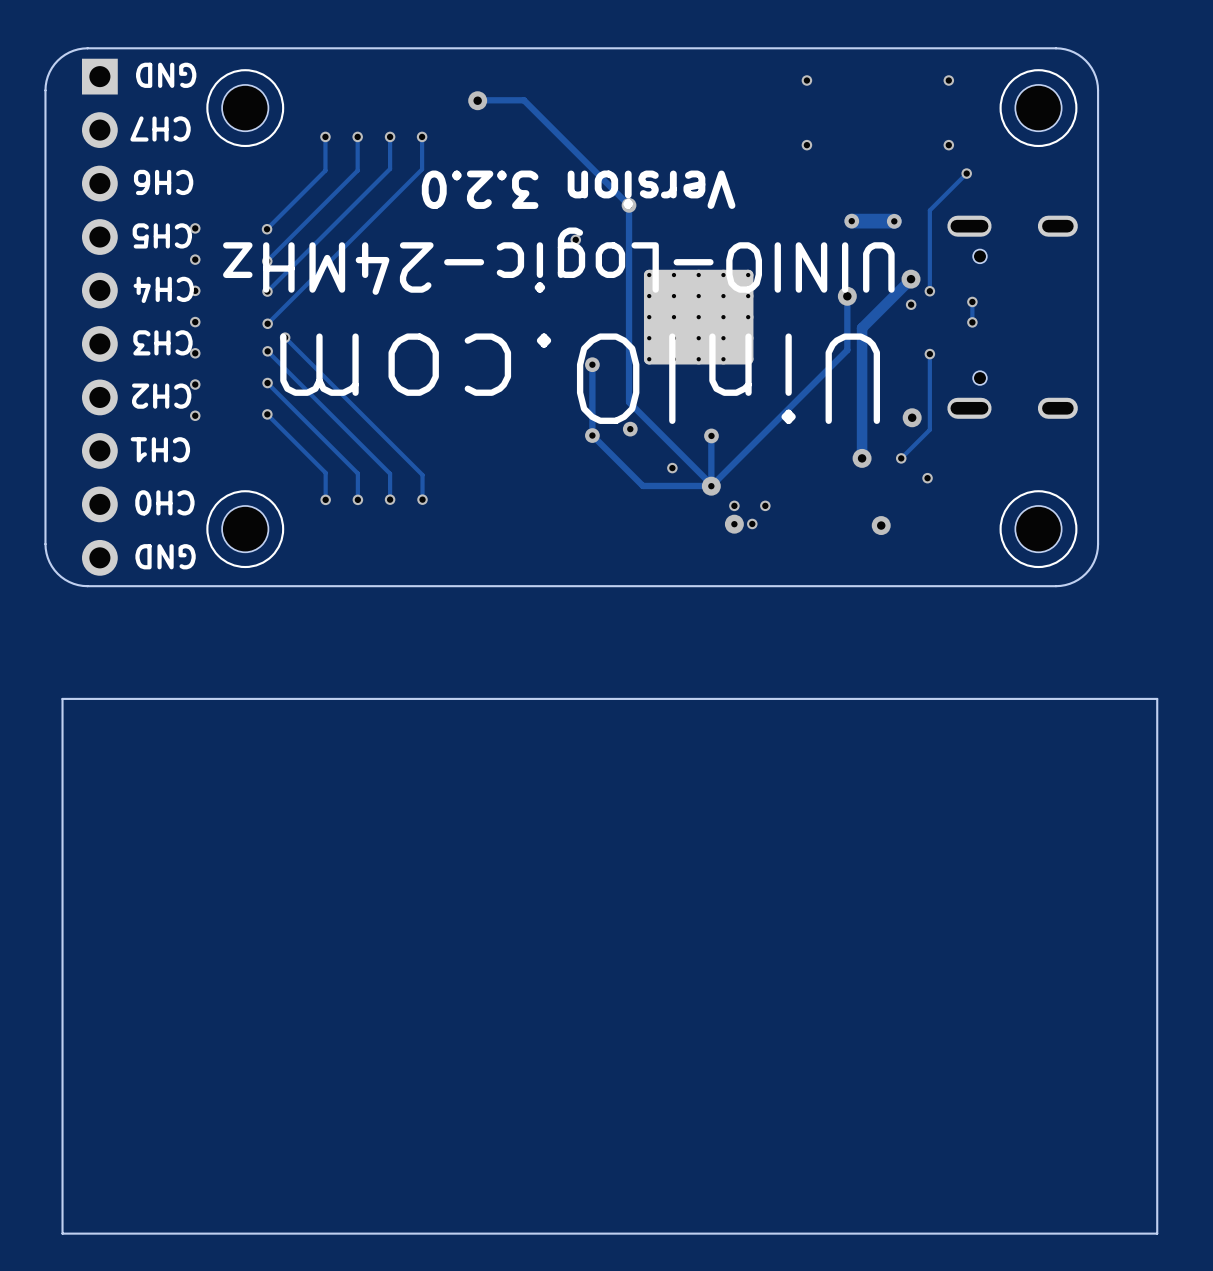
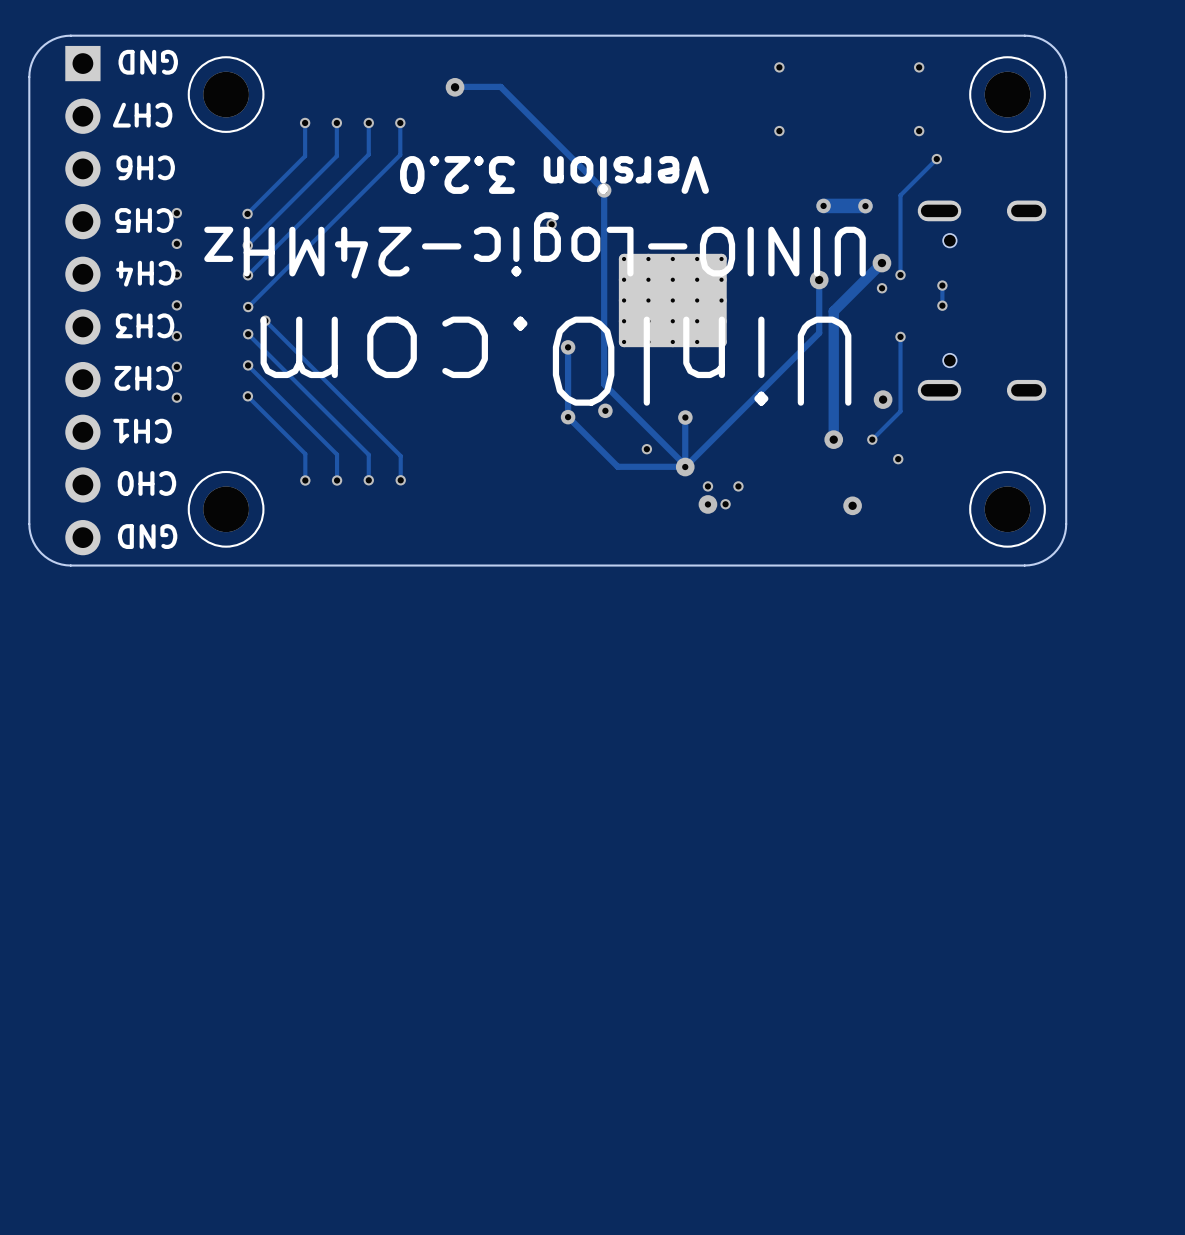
part footprint: [206, 69, 285, 148] -> [187, 56, 265, 133]
part footprint: [999, 69, 1078, 148] -> [969, 56, 1046, 133]
part footprint: [206, 490, 285, 569] -> [187, 470, 265, 548]
part footprint: [999, 490, 1078, 569] -> [969, 470, 1046, 548]
board edge: (1157, 698) (62, 698) (62, 1233) (1157, 1233) (1157, 698) -> none

